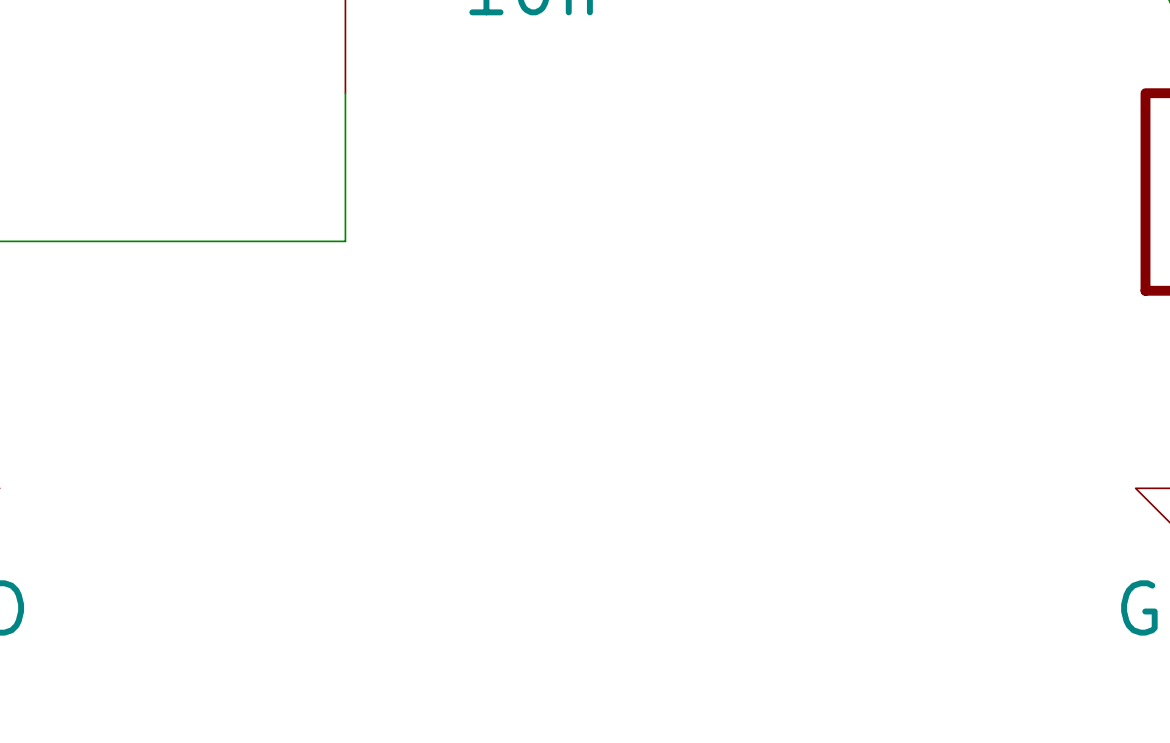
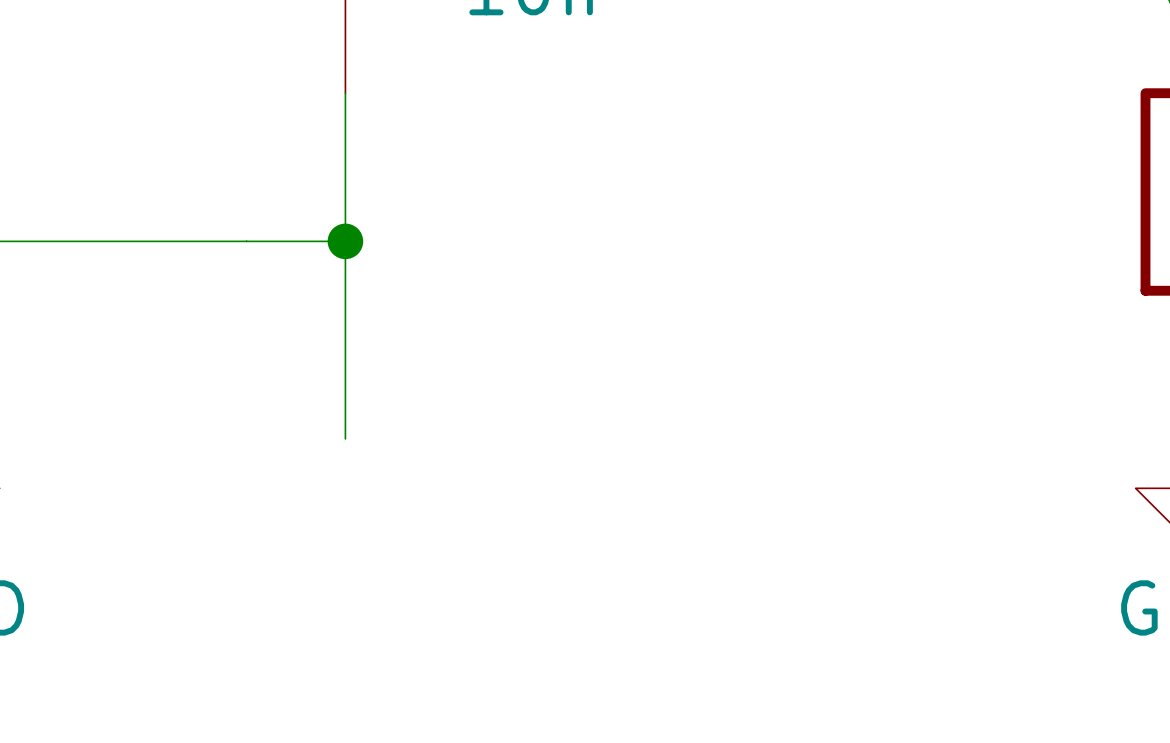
wire: none -> (345, 241) (345, 438)
junction: none -> (345, 241)

